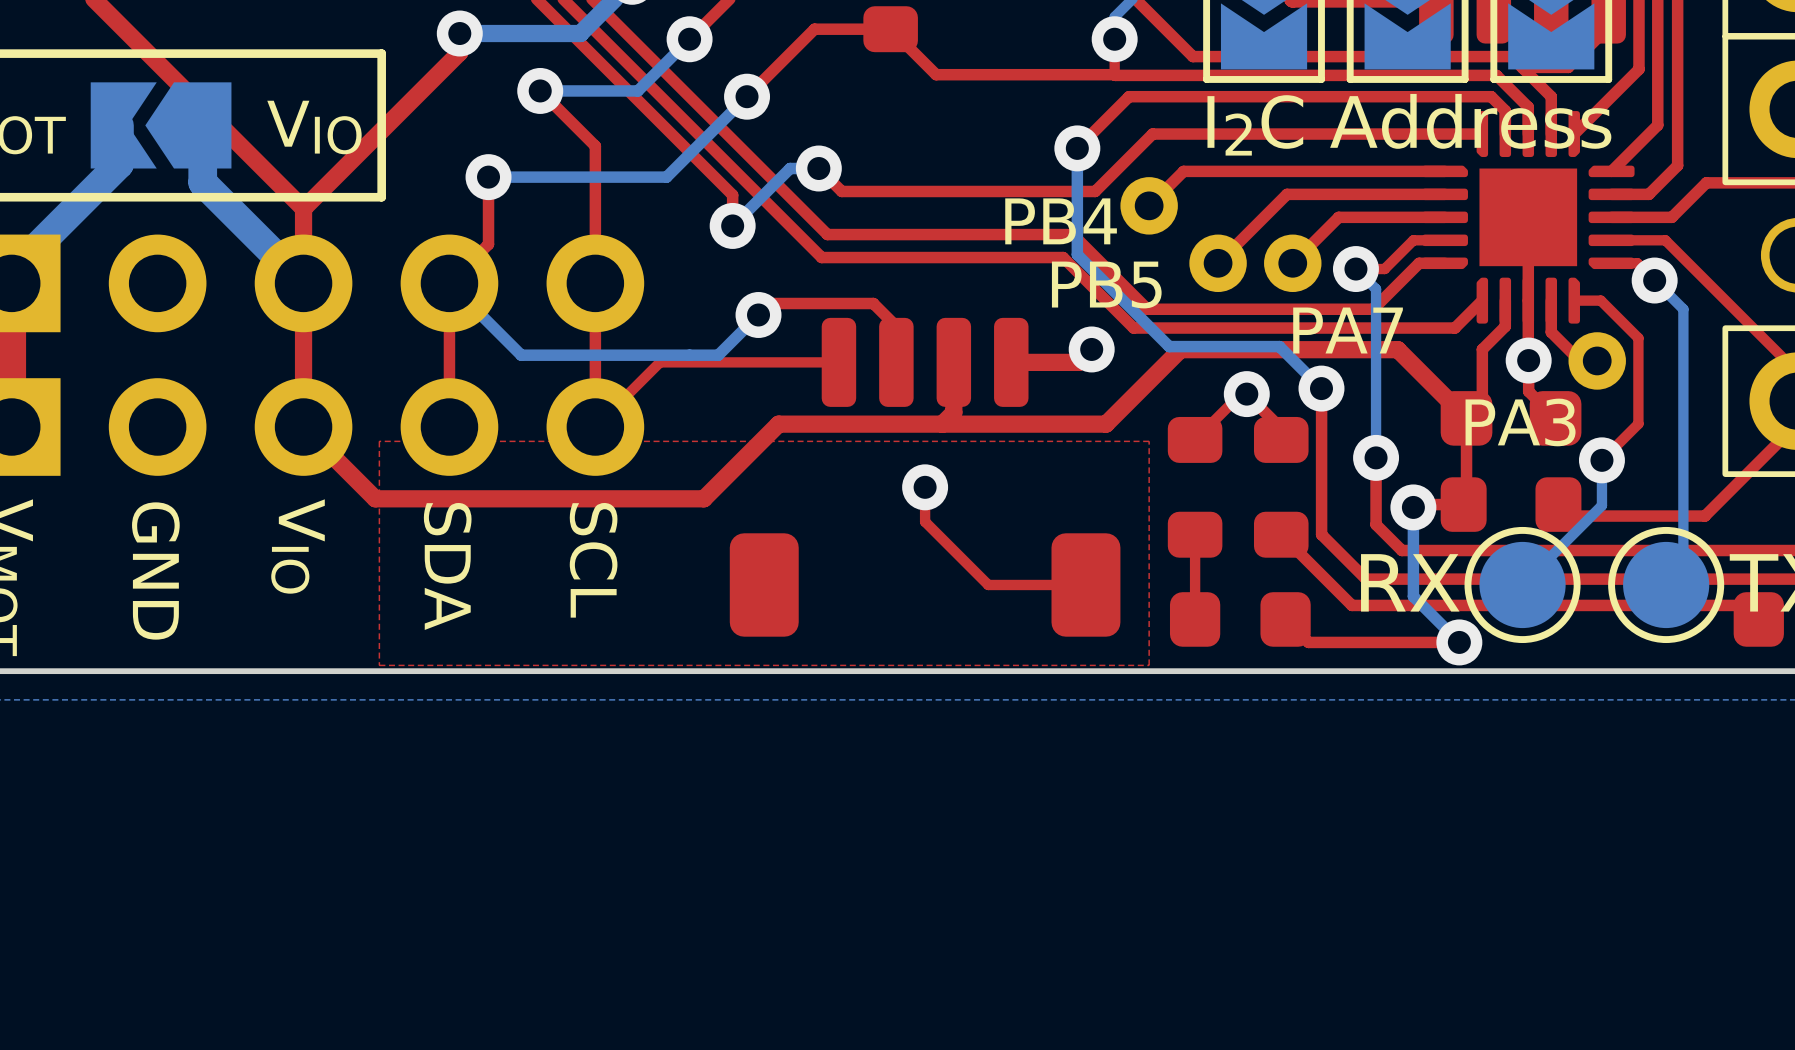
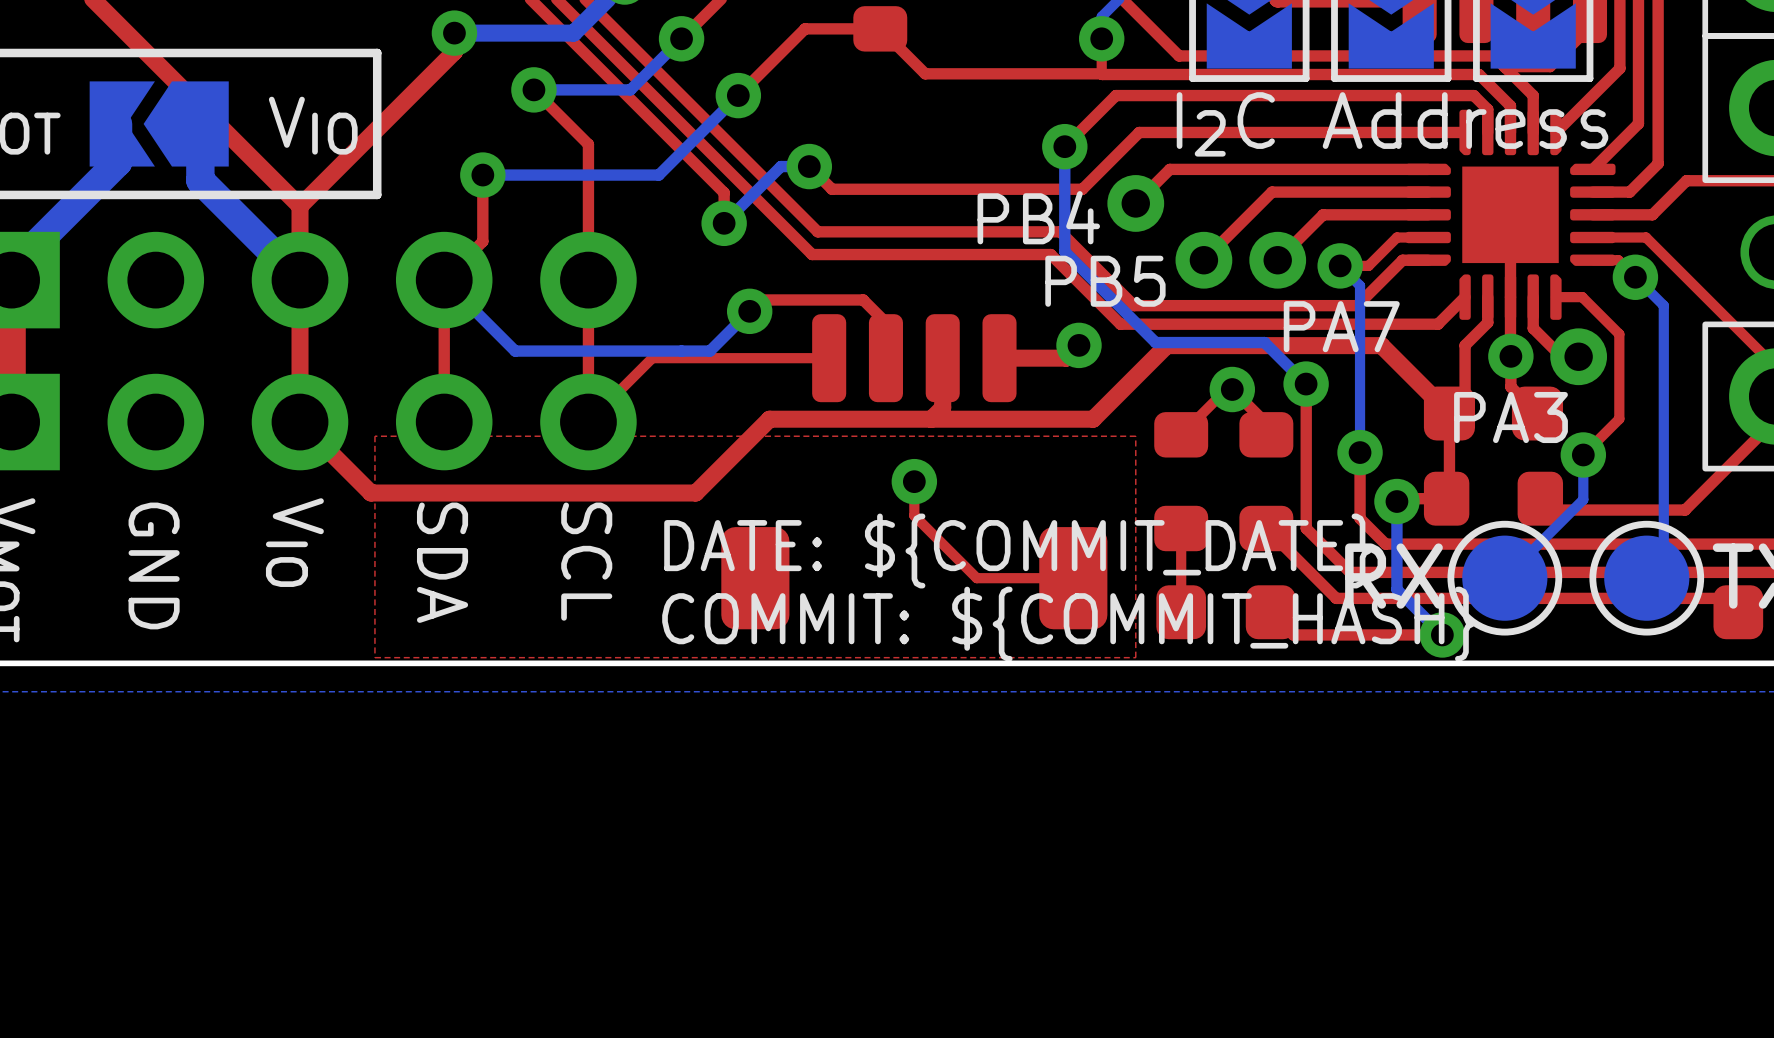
text: none -> DATE: ${COMMIT_DATE} (1017, 551)
text: none -> COMMIT: ${COMMIT_HASH} (1068, 624)

